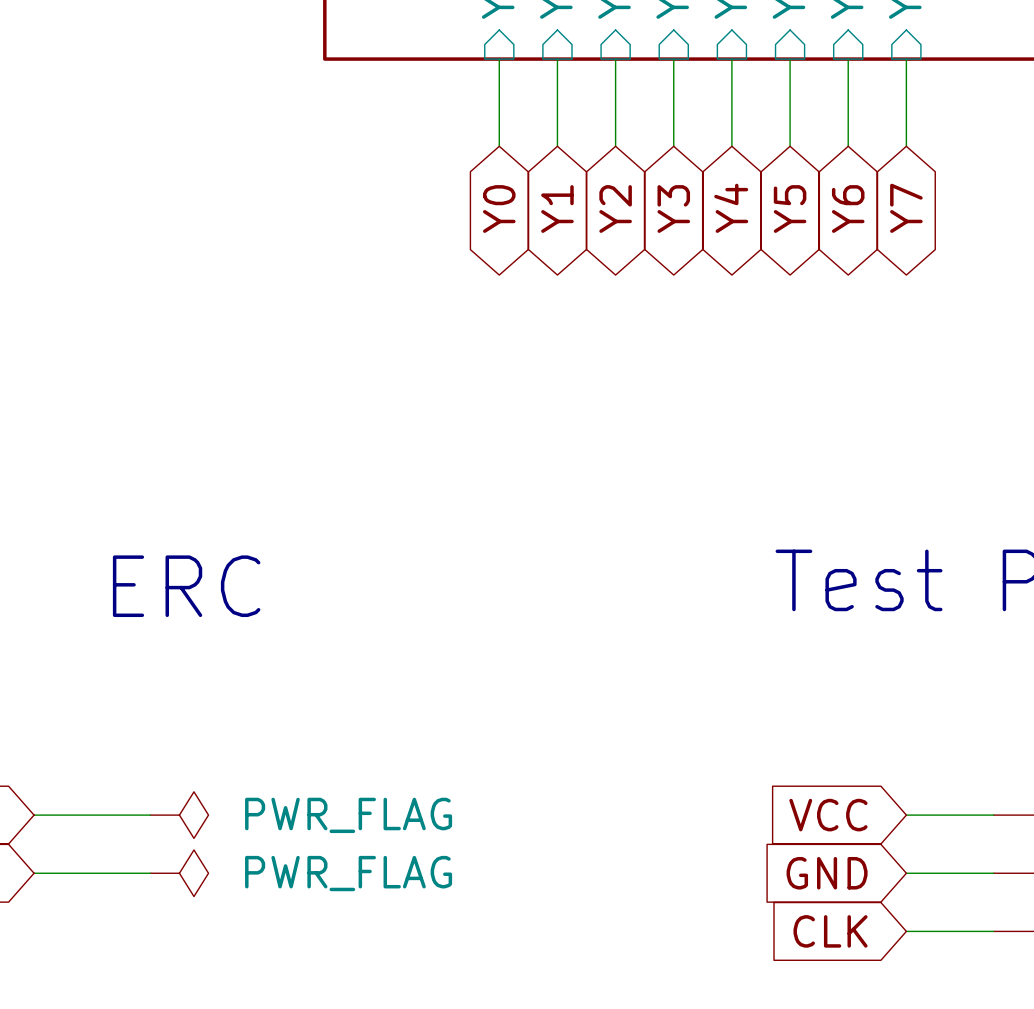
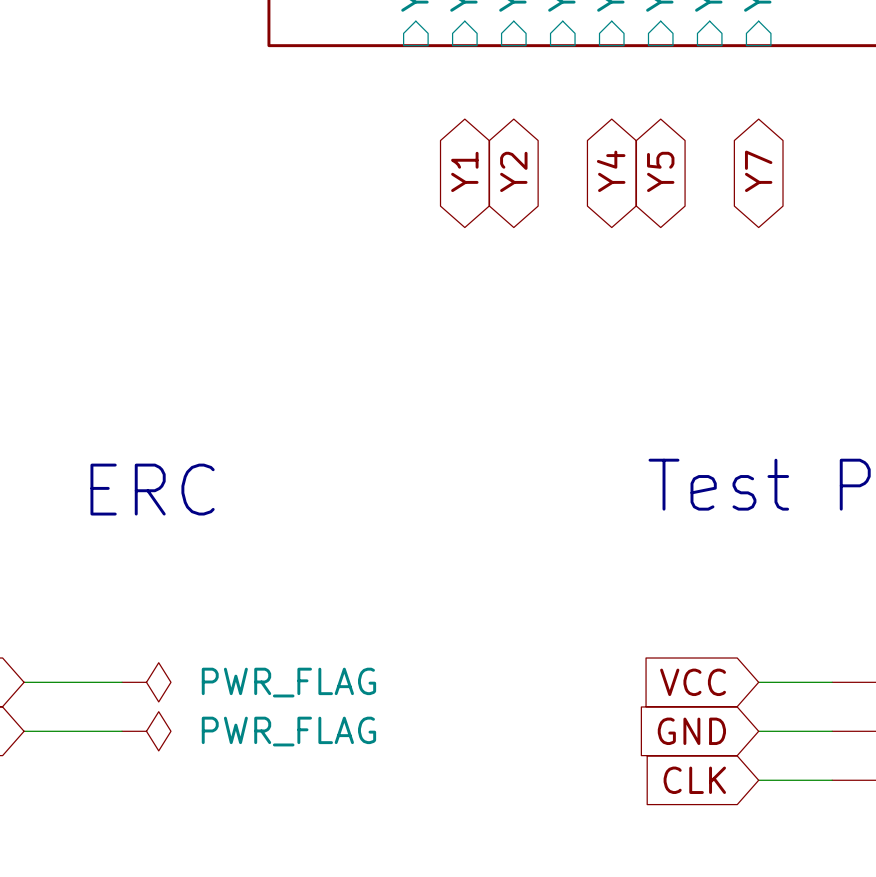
wire: (499, 59) (499, 146) -> none
wire: (557, 59) (557, 146) -> none
wire: (615, 59) (615, 146) -> none
wire: (673, 59) (673, 146) -> none
wire: (731, 59) (731, 146) -> none
wire: (790, 59) (790, 146) -> none
wire: (848, 59) (848, 146) -> none
wire: (906, 59) (906, 146) -> none
global label: Y0 (499, 209) -> none
global label: Y3 (673, 209) -> none
global label: Y6 (848, 209) -> none

